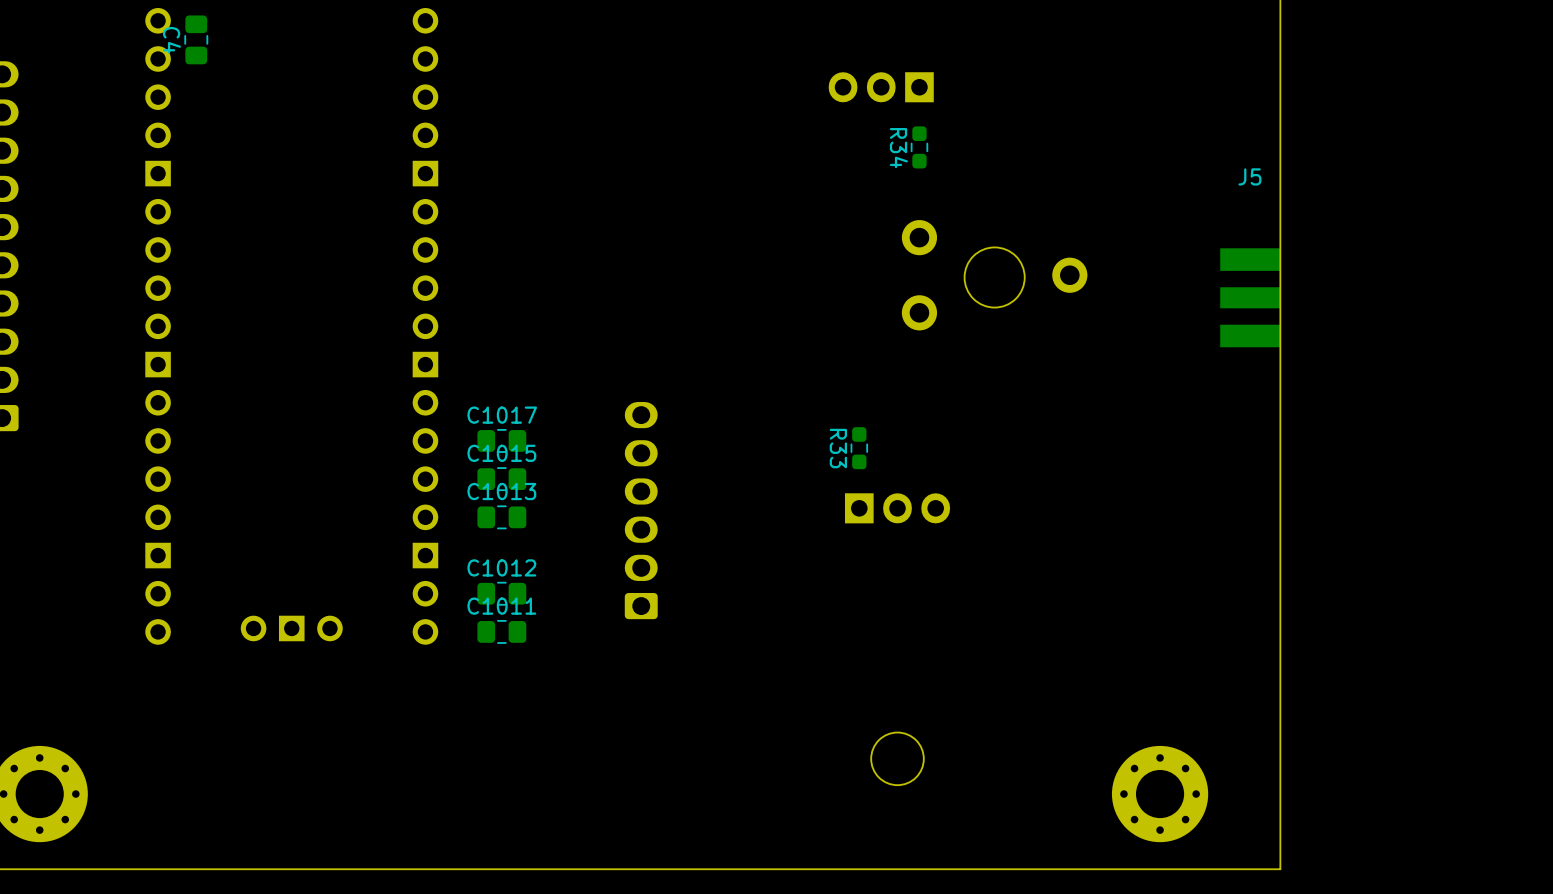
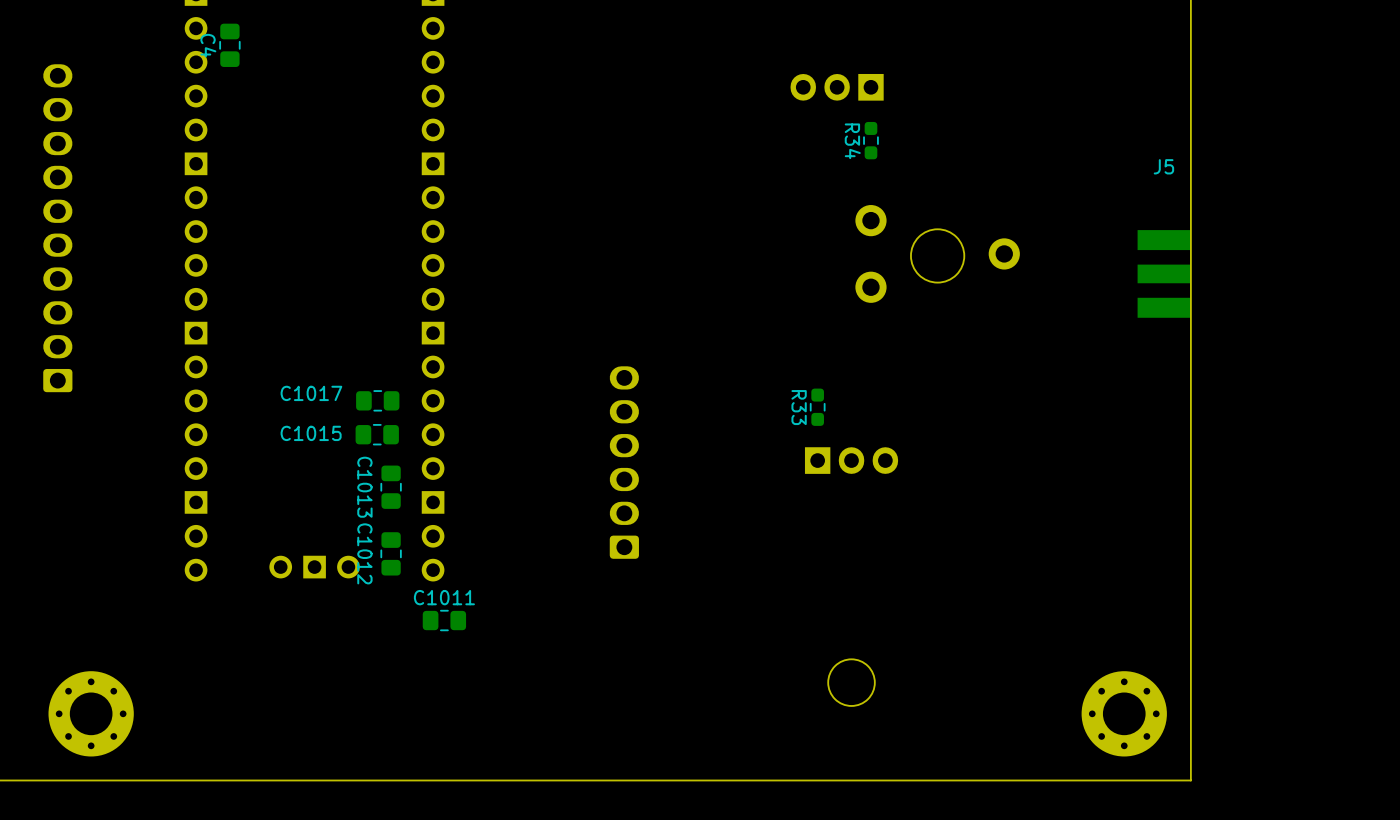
C1017 name position: C1017 (502, 415) -> C1017 (311, 393)
C1017 position: (501, 440) -> (377, 400)
C1015 name position: C1015 (501, 453) -> C1015 (311, 433)
C1015 position: (501, 479) -> (377, 434)
C1013 name position: C1013 (501, 491) -> C1013 (364, 487)
C1013 rotation: 0° (501, 517) -> 90° clockwise (391, 487)
C1013 position: (501, 517) -> (391, 487)
C1012 name position: C1012 (501, 567) -> C1012 (364, 553)
C1012 rotation: 0° (501, 593) -> 90° clockwise (391, 553)
C1012 position: (501, 593) -> (391, 553)
C1011 position: (501, 631) -> (444, 620)
part position: (1160, 794) -> (1124, 713)

